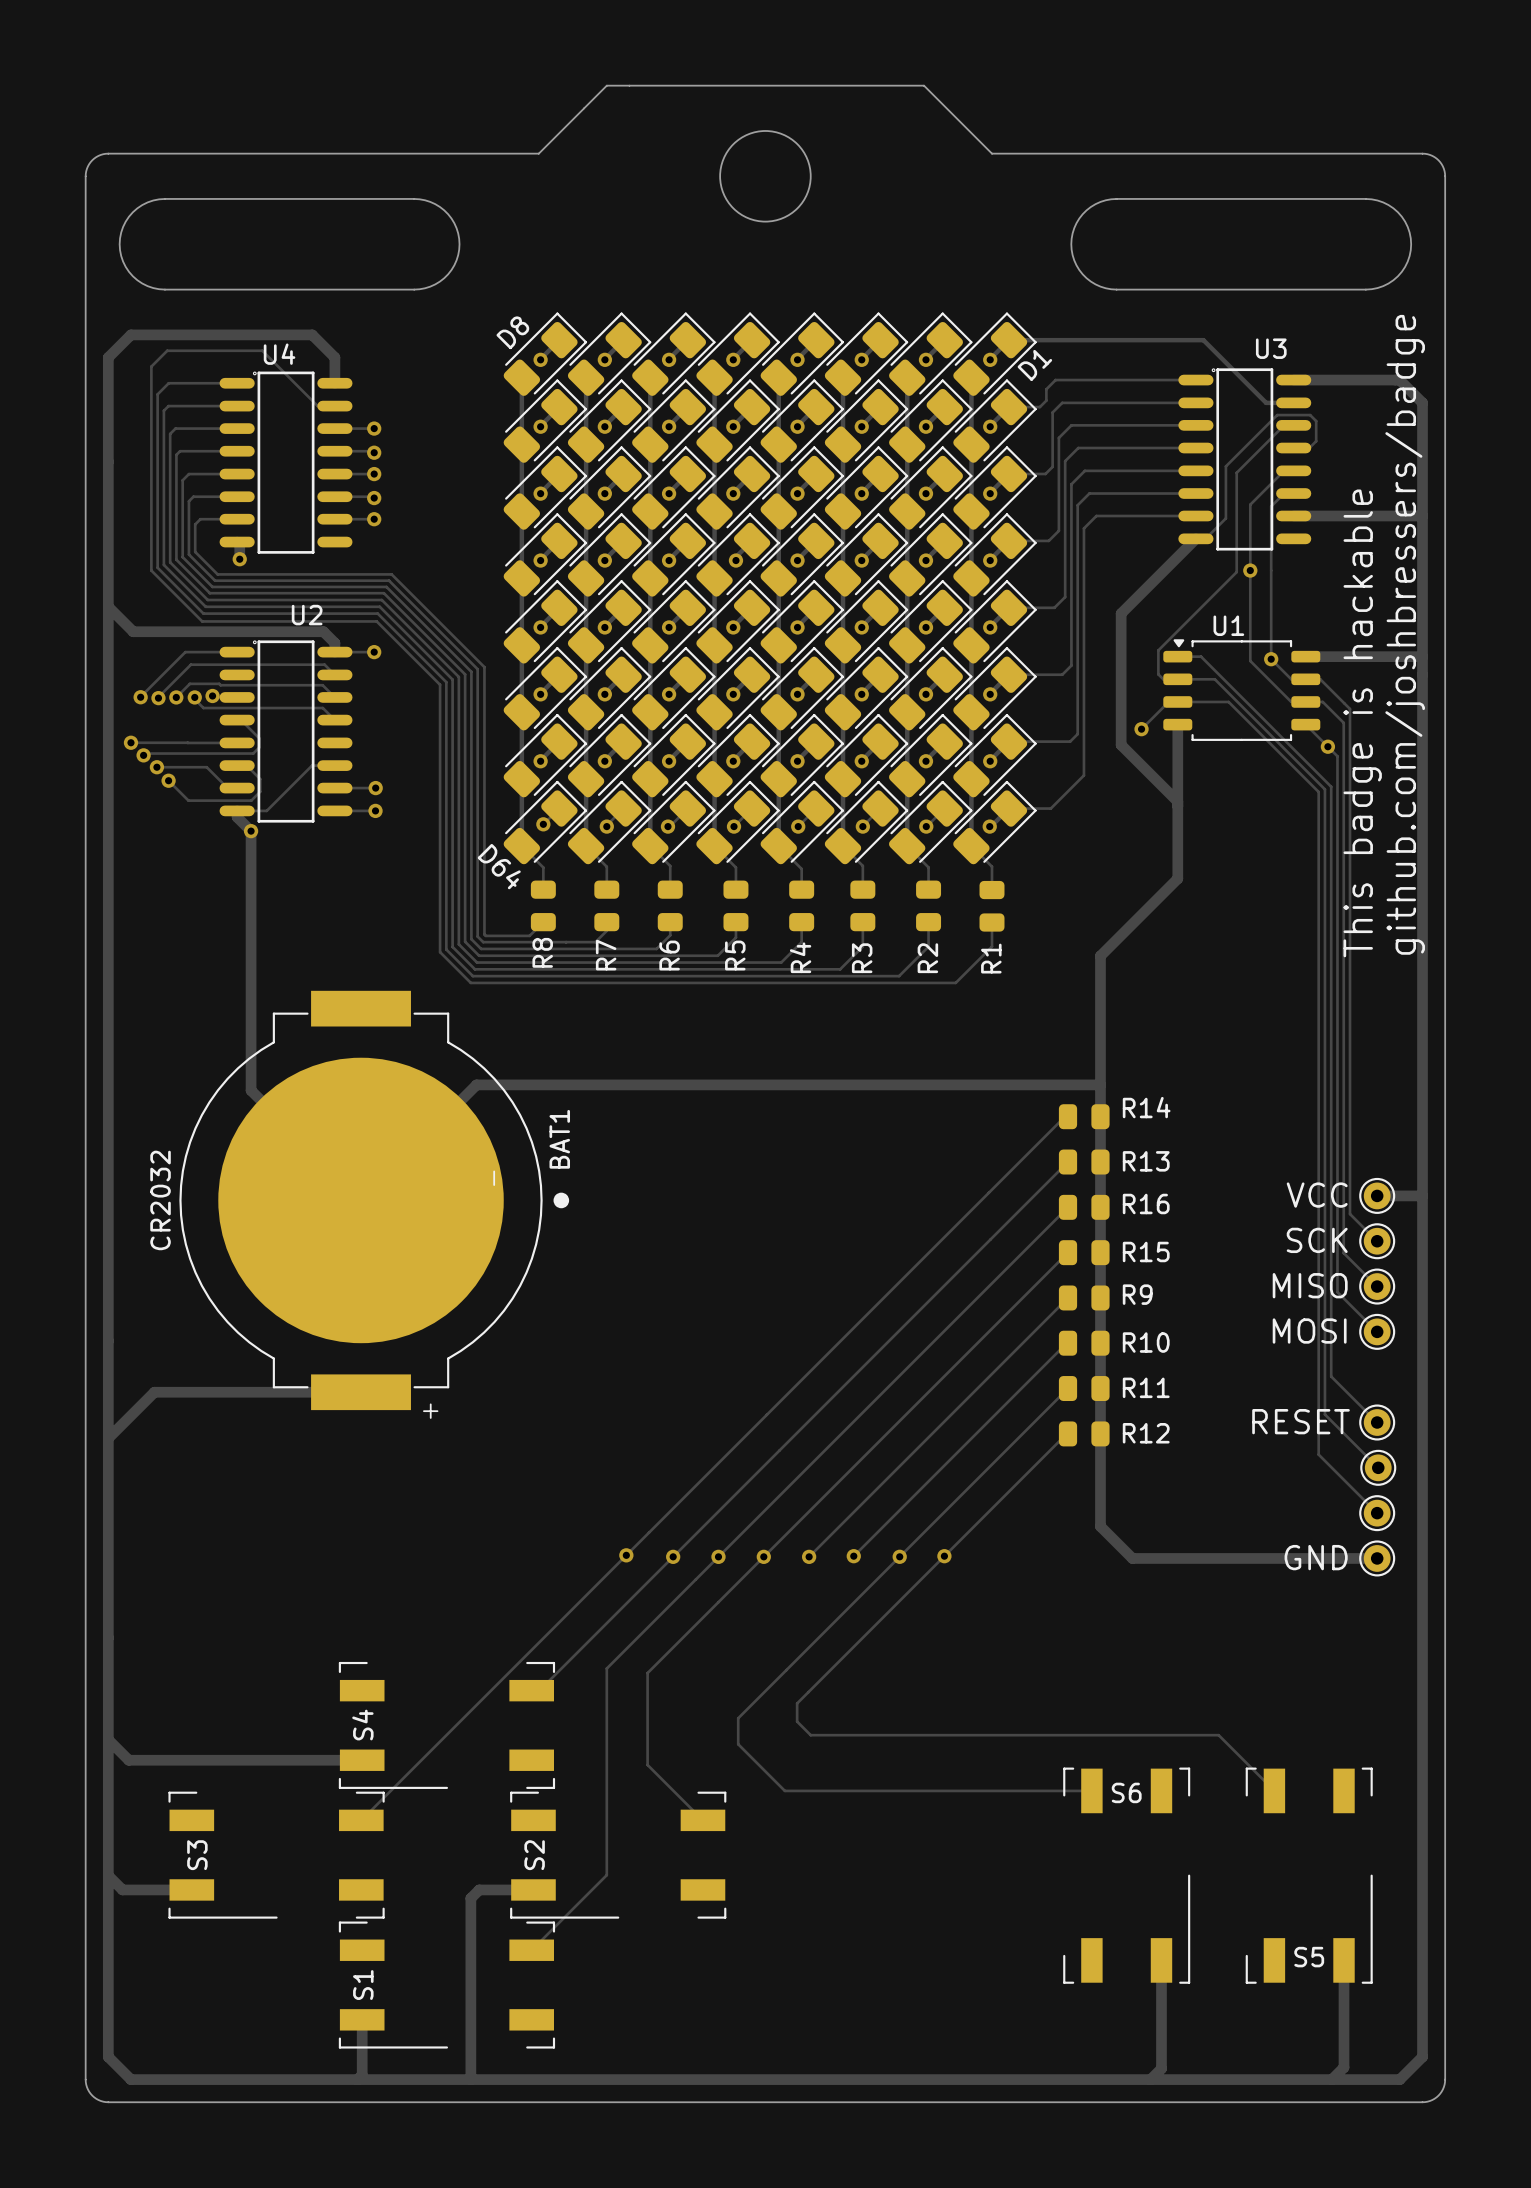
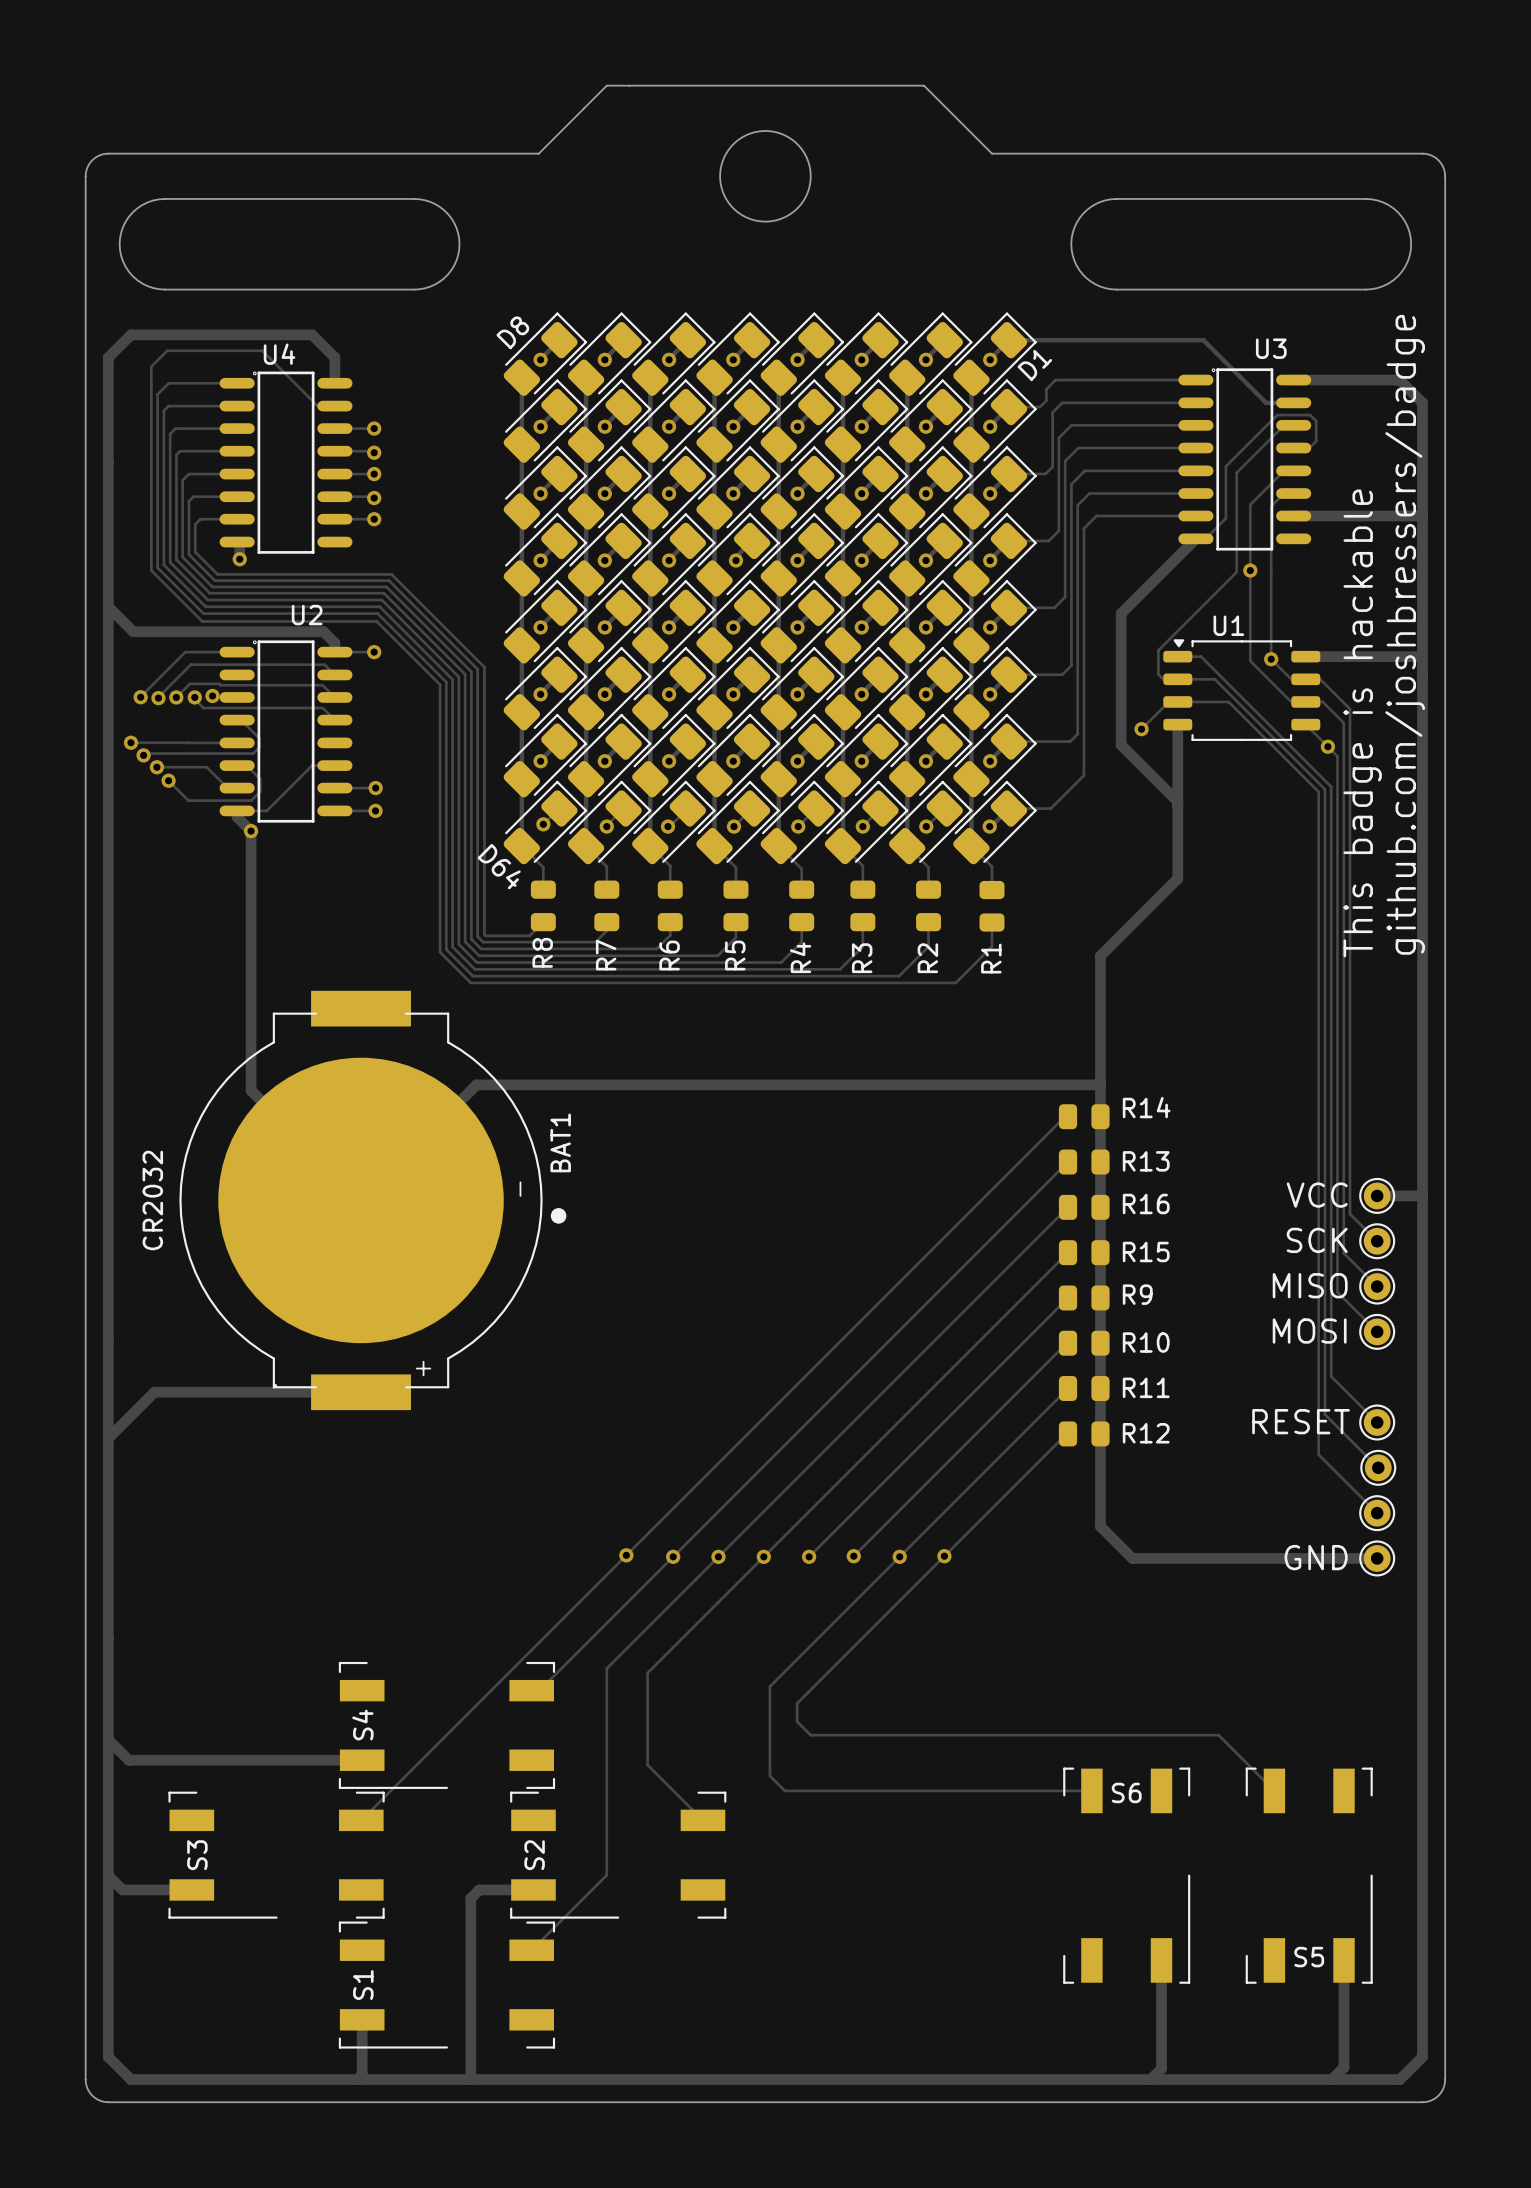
BAT1 footprint: [179, 990, 570, 1411] -> [179, 990, 567, 1411]
track: (769, 1686) (738, 1718) (738, 1744) (769, 1775) -> (769, 1686) (769, 1775)

